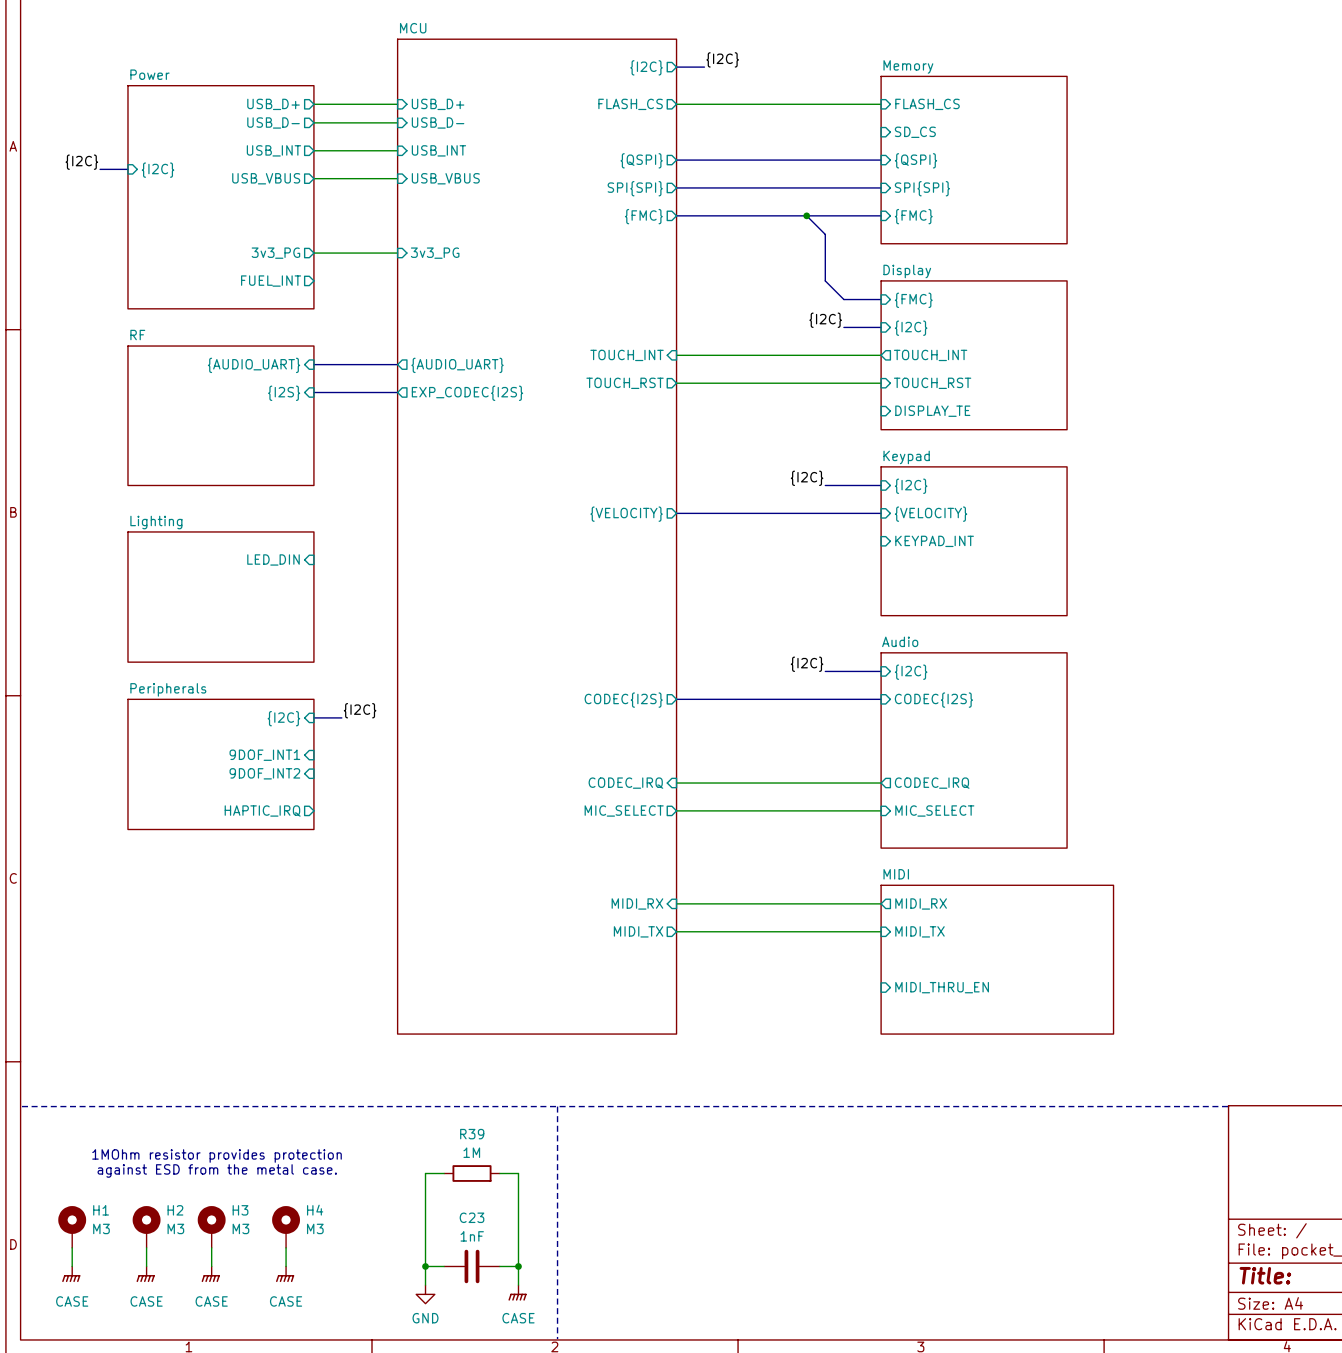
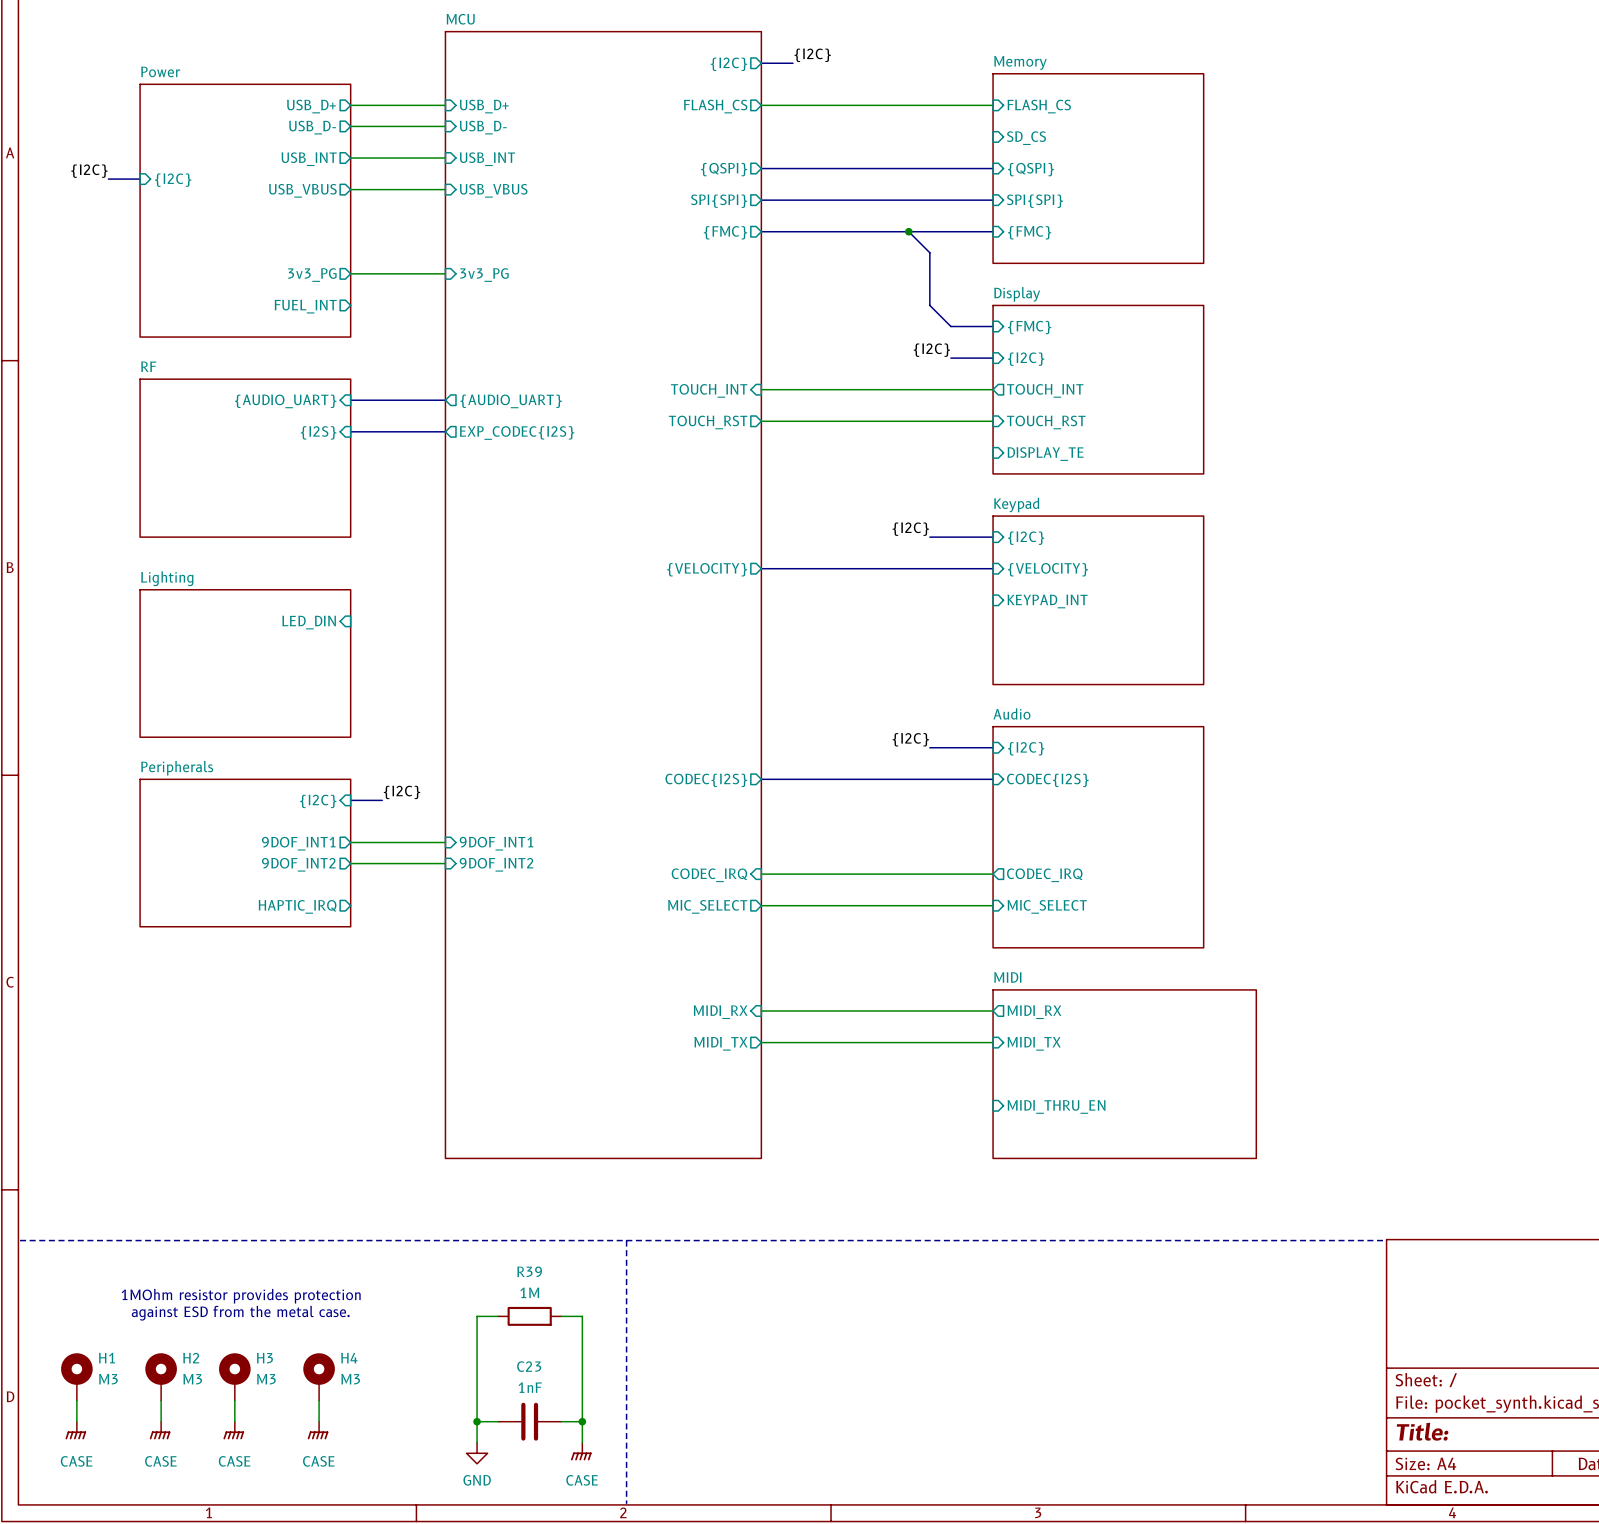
sheet pin shape: input (264, 755) -> output (298, 843)
wire: none -> (350, 842) (445, 842)
sheet pin: none -> 9DOF_INT1 (496, 843)
sheet pin shape: input (264, 773) -> output (298, 864)
wire: none -> (350, 863) (445, 863)
sheet pin: none -> 9DOF_INT2 (496, 864)

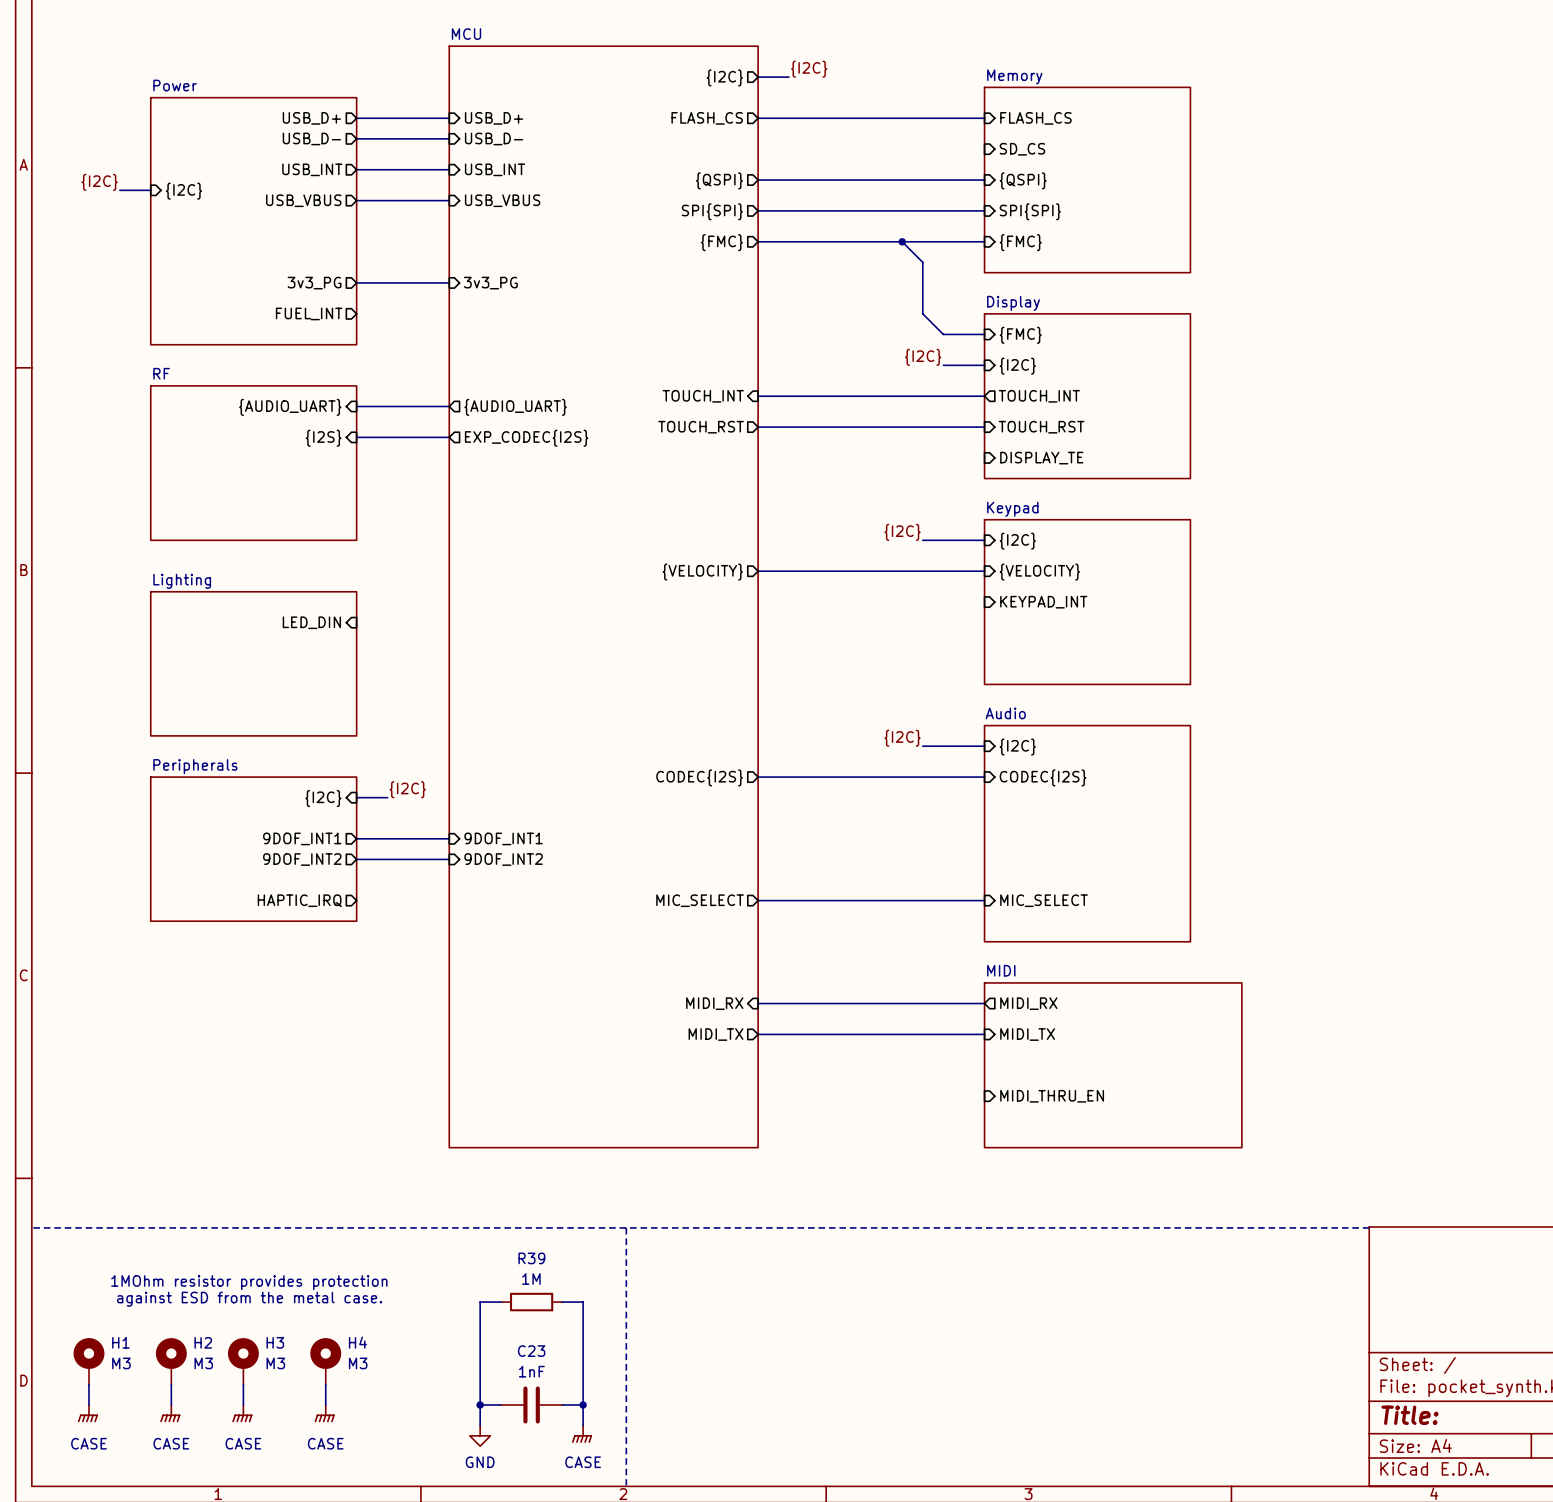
wire: (761, 874) (993, 874) -> none
sheet pin: CODEC_IRQ (709, 875) -> none
sheet pin: CODEC_IRQ (1044, 875) -> none

